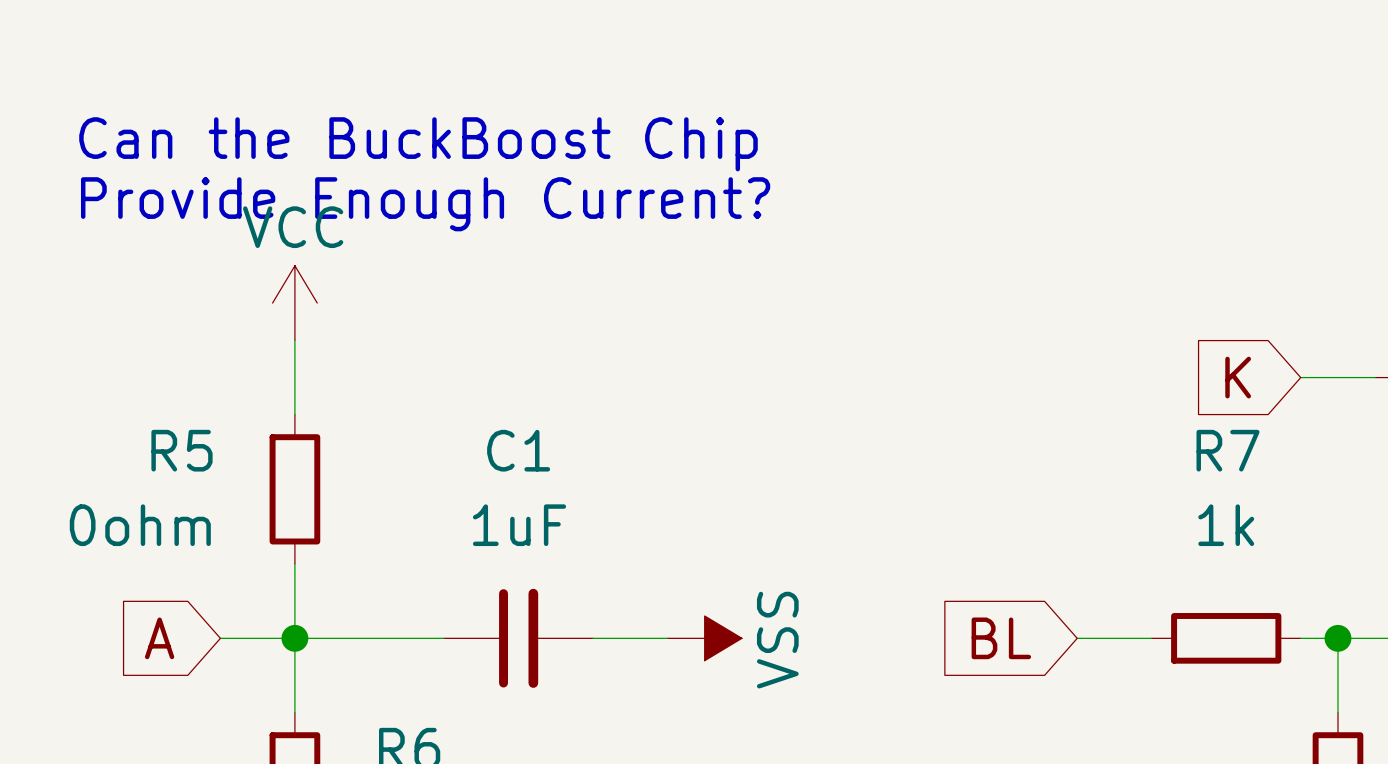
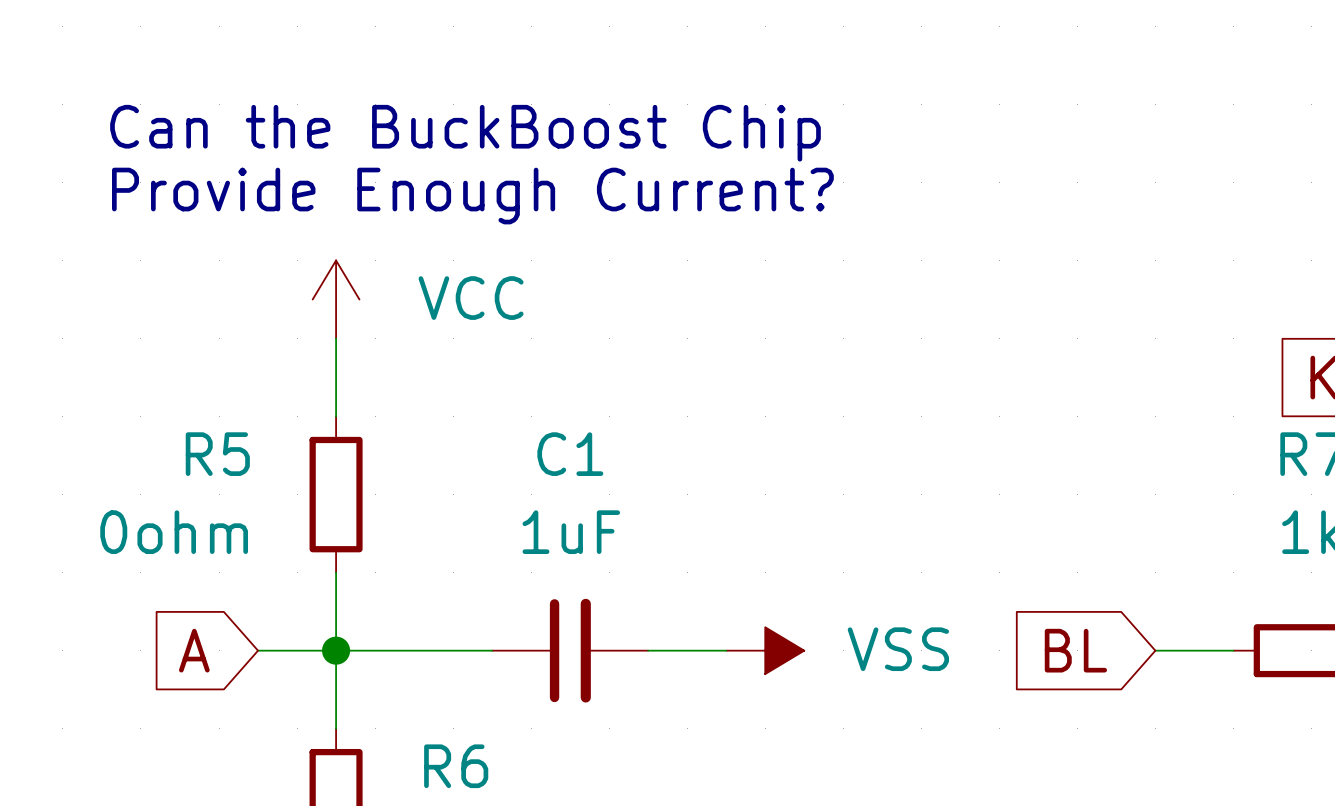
power symbol text position: VCC (293, 227) -> VCC (471, 298)
power symbol text rotation: 0° (777, 640) -> 90° clockwise (898, 649)

